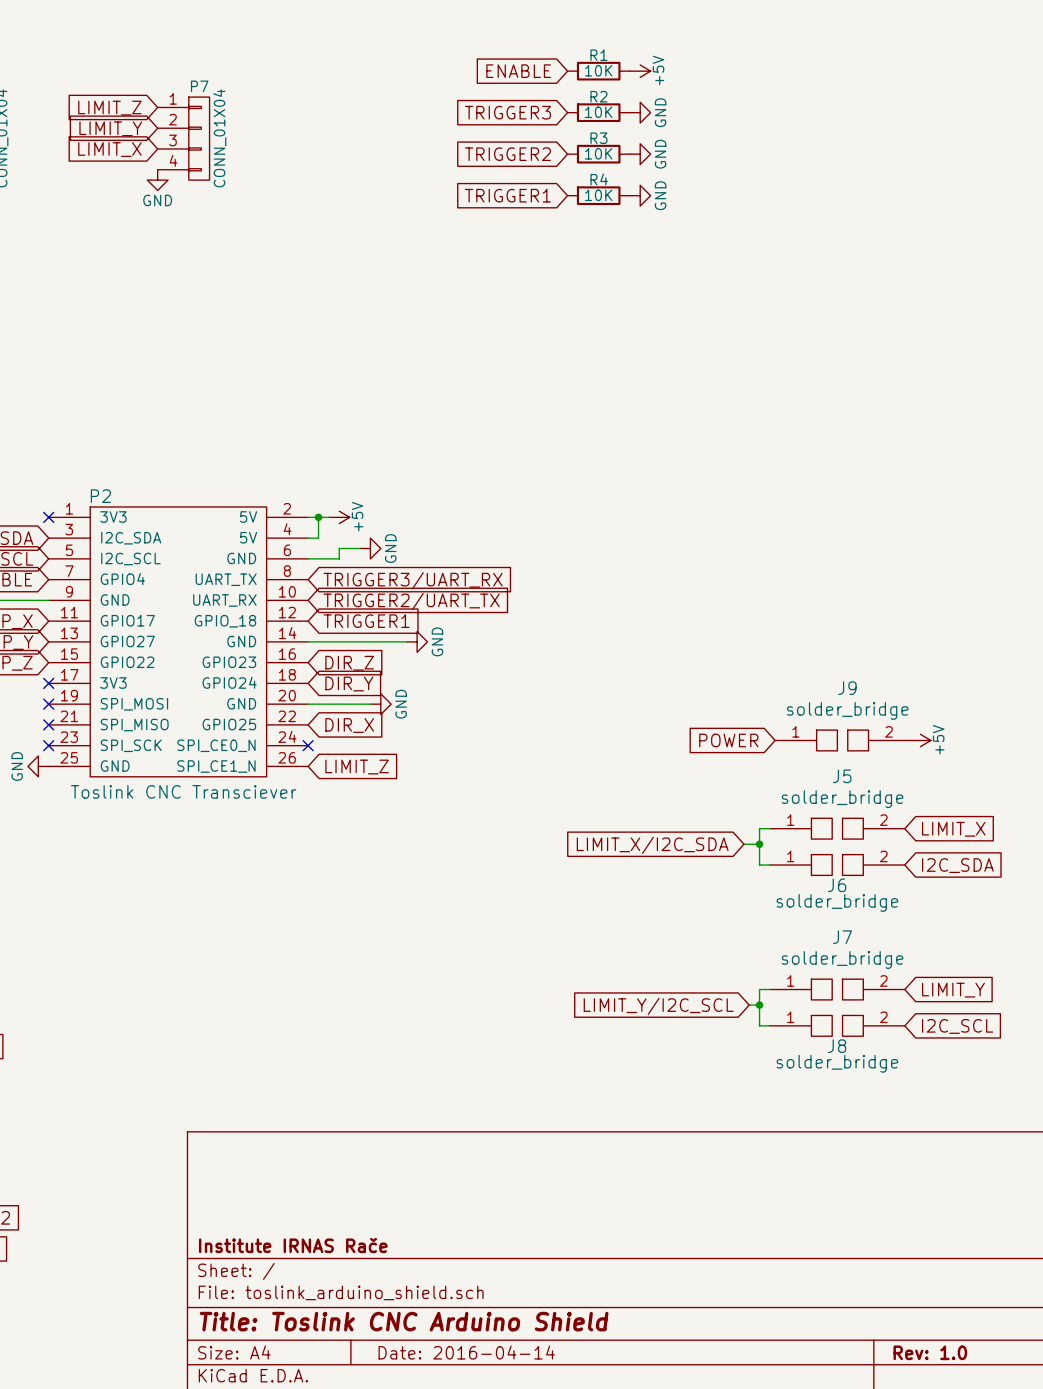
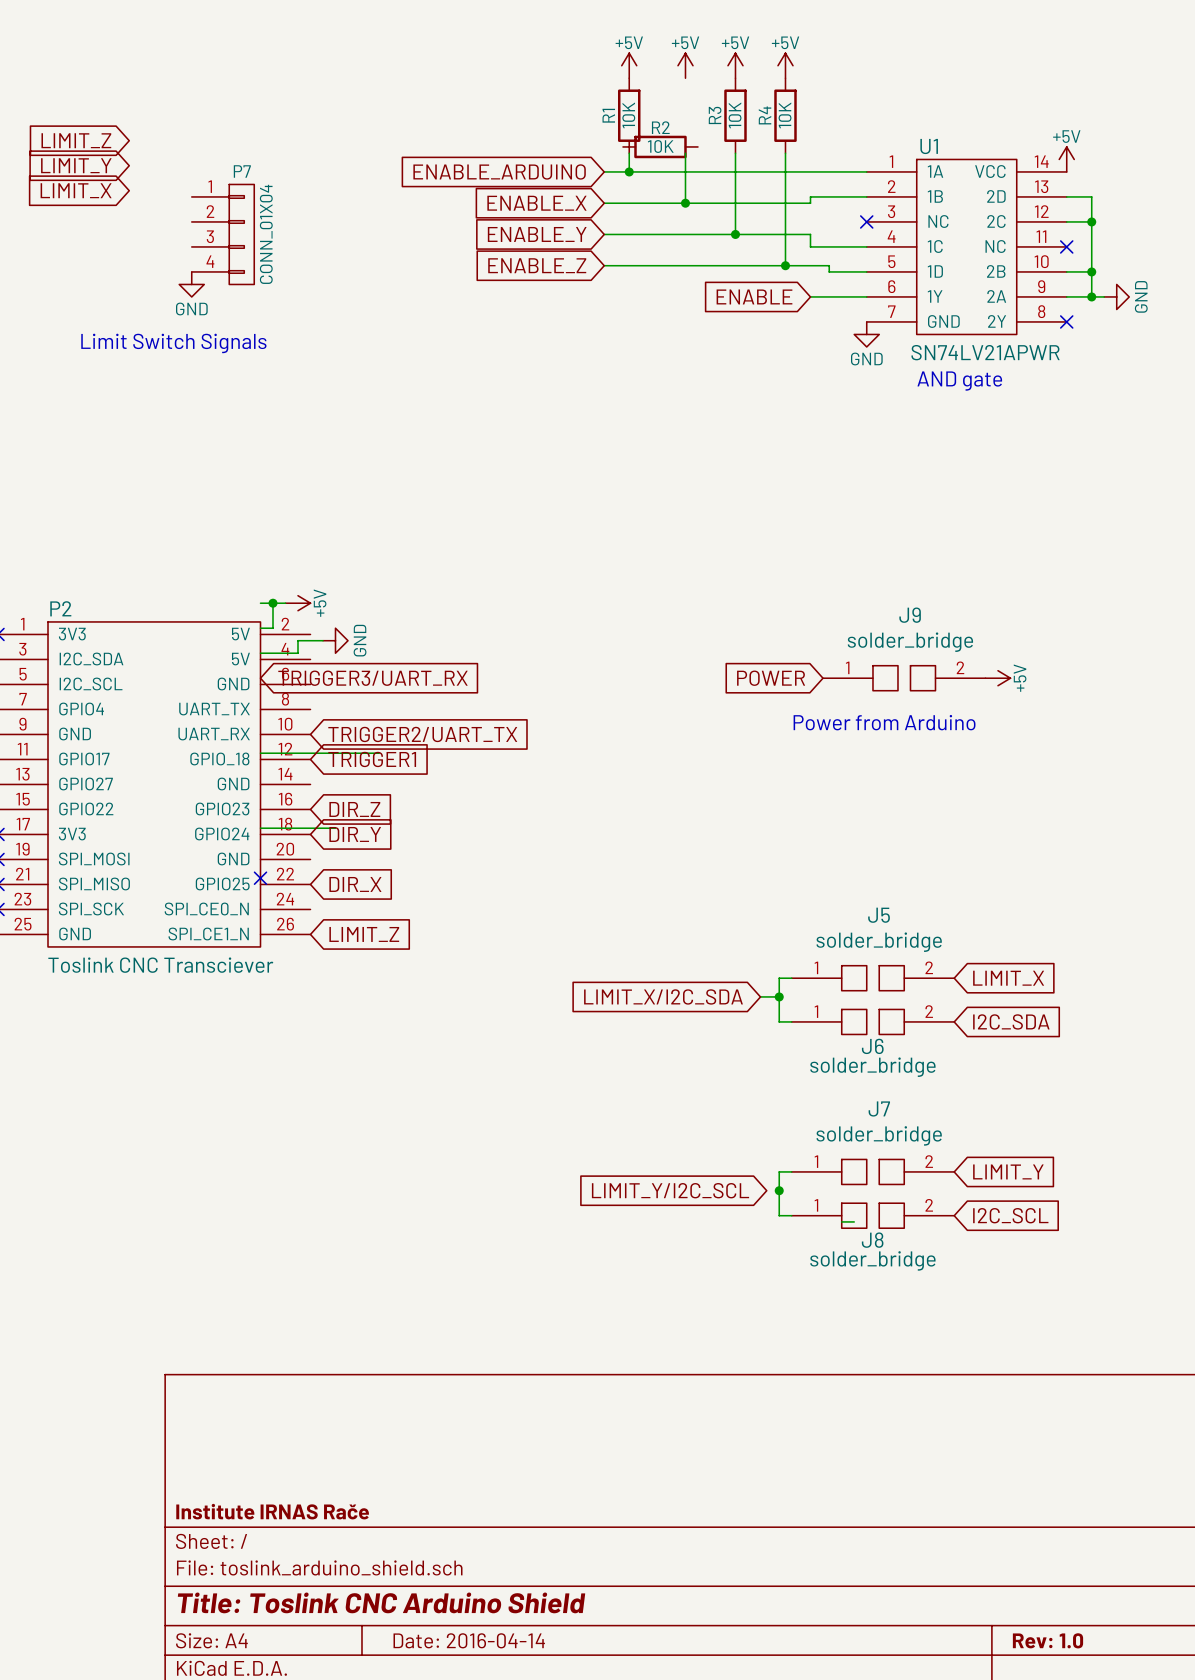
power symbol: none -> +5V (629, 65)
power symbol: none -> +5V (685, 65)
power symbol: none -> +5V (735, 65)
power symbol: none -> +5V (785, 65)
R1 name position: R1 (598, 55) -> R1 (608, 115)
global label: ENABLE (518, 71) -> none
R1 rotation: 0° (598, 71) -> 90° clockwise (629, 115)
power symbol: +5V (640, 71) -> none
global label: TRIGGER3 (507, 112) -> none
power symbol: GND (640, 112) -> none
wire: none -> (629, 153) (629, 171)
wire: none -> (685, 153) (685, 203)
wire: none -> (735, 153) (735, 234)
wire: none -> (785, 153) (785, 265)
power symbol: none -> +5V (1066, 159)
wire: none -> (604, 171) (866, 171)
junction: none -> (629, 171)
global label: none -> ENABLE_ARDUINO (499, 171)
P7 position: (183, 138) -> (222, 234)
R3 name position: R3 (598, 138) -> R3 (715, 115)
global label: TRIGGER2 (507, 154) -> none
R3 rotation: 0° (598, 154) -> 90° clockwise (735, 115)
R3 position: (598, 154) -> (735, 115)
power symbol: GND (640, 154) -> none
wire: none -> (866, 196) (810, 196) (810, 203) (604, 203)
wire: none -> (1066, 196) (1091, 196) (1091, 296)
global label: none -> ENABLE_X (536, 203)
junction: none -> (685, 203)
no-connect mark: none -> (866, 221)
wire: none -> (1066, 221) (1091, 221)
junction: none -> (1091, 221)
R4 name position: R4 (599, 179) -> R4 (765, 115)
power symbol position: GND (157, 180) -> GND (191, 284)
global label: none -> ENABLE_Y (537, 234)
wire: none -> (604, 234) (810, 234) (810, 246) (866, 246)
junction: none -> (735, 234)
global label: TRIGGER1 (507, 195) -> none
R4 rotation: 0° (598, 195) -> 90° clockwise (785, 115)
R4 position: (598, 195) -> (785, 115)
power symbol: GND (640, 195) -> none
U1: none -> SN74LV21APWR (966, 246)
no-connect mark: none -> (1066, 246)
global label: none -> ENABLE_Z (537, 265)
wire: none -> (604, 265) (829, 265) (829, 271) (866, 271)
junction: none -> (785, 265)
wire: none -> (1066, 271) (1091, 271)
junction: none -> (1091, 271)
global label: none -> ENABLE (754, 296)
wire: none -> (810, 296) (866, 296)
wire: none -> (1066, 296) (1104, 296)
junction: none -> (1091, 296)
power symbol: none -> GND (1116, 296)
no-connect mark: none -> (1066, 321)
power symbol: none -> GND (866, 334)
text: none -> Limit Switch Signals (173, 343)
text: none -> AND gate (959, 381)
wire: (308, 517) (328, 517) -> (260, 603) (285, 603)
wire: (318, 517) (318, 538) (308, 538) -> (272, 603) (272, 628) (260, 628)
junction position: (318, 517) -> (272, 603)
power symbol position: +5V (339, 517) -> +5V (297, 603)
wire: (360, 548) (339, 548) (339, 558) (308, 558) -> (322, 640) (297, 640) (297, 653) (260, 653)
power symbol position: GND (370, 548) -> GND (335, 640)
global label position: TRIGGER3/UART_RX (413, 580) -> TRIGGER3/UART_RX (372, 678)
text: none -> Power from Arduino (884, 722)
wire: (308, 641) (406, 641) -> (260, 753) (379, 753)
power symbol: GND (417, 641) -> none
wire: (308, 704) (370, 704) -> (260, 828) (335, 828)
power symbol: GND (380, 704) -> none
global label position: POWER (728, 740) -> POWER (771, 678)
J9 position: (842, 740) -> (904, 678)
power symbol position: +5V (920, 740) -> +5V (997, 678)
no-connect mark position: (308, 745) -> (260, 878)
junction: none -> (779, 996)
wire: (769, 828) (759, 828) (759, 865) (769, 865) -> (791, 978) (779, 978) (779, 1021) (791, 1021)
J5 position: (837, 828) -> (872, 978)
global label position: LIMIT_X (953, 829) -> LIMIT_X (1008, 978)
wire: (743, 844) (759, 844) -> (760, 996) (779, 996)
junction: (759, 844) -> none
global label position: LIMIT_X/I2C_SDA (652, 845) -> LIMIT_X/I2C_SDA (663, 996)
J6 position: (837, 865) -> (872, 1021)
global label position: I2C_SDA (957, 865) -> I2C_SDA (1011, 1021)
junction: none -> (779, 1190)
wire: (769, 989) (759, 989) (759, 1025) (769, 1025) -> (791, 1171) (779, 1171) (779, 1215) (791, 1215)
J7 position: (837, 989) -> (872, 1171)
global label position: LIMIT_Y (953, 990) -> LIMIT_Y (1008, 1171)
junction: (759, 1005) -> none
global label position: LIMIT_Y/I2C_SCL (658, 1006) -> LIMIT_Y/I2C_SCL (670, 1190)
J8 position: (837, 1025) -> (872, 1215)
global label position: I2C_SCL (957, 1026) -> I2C_SCL (1010, 1215)

